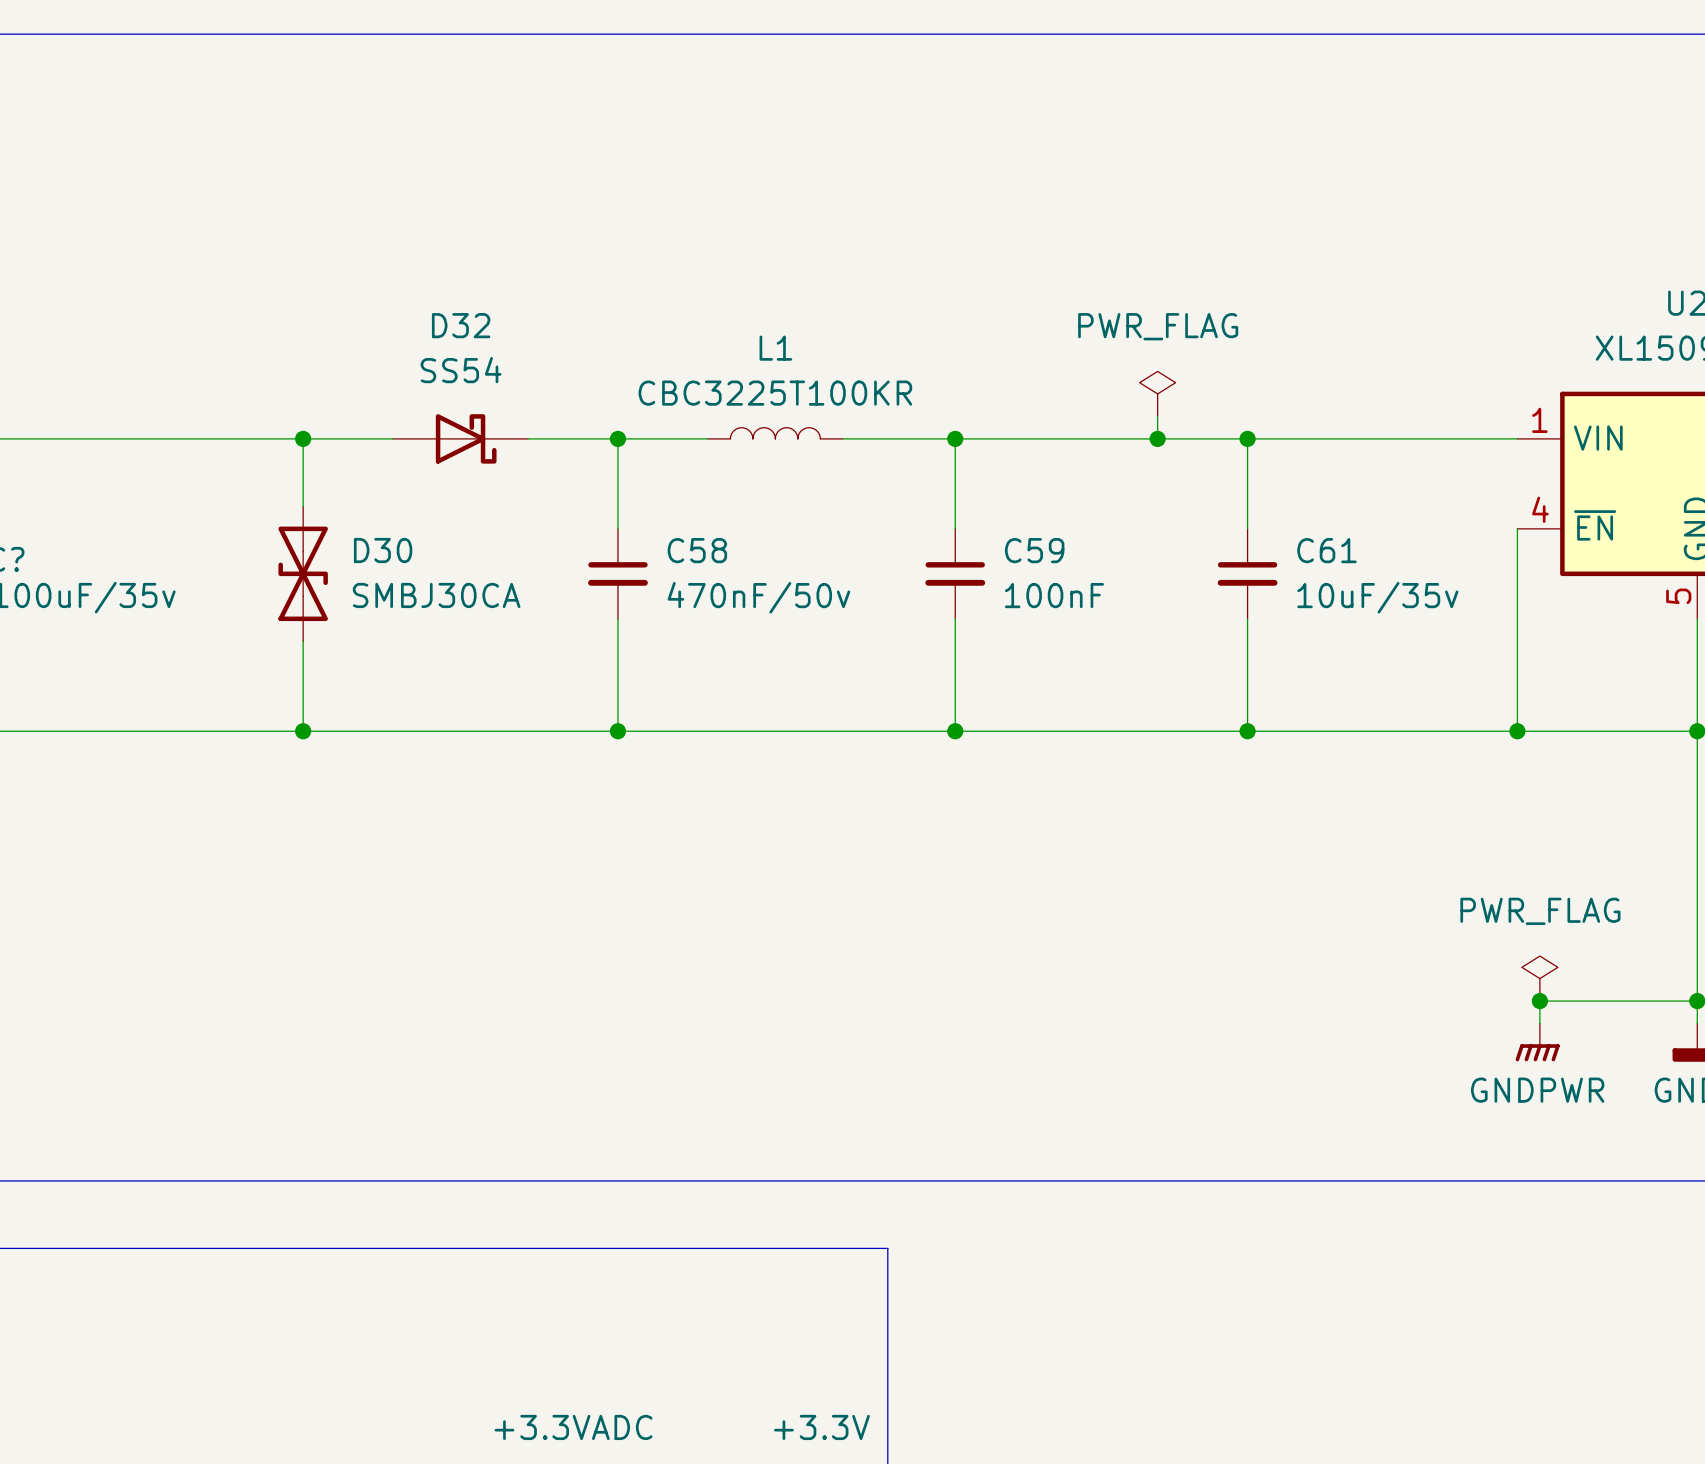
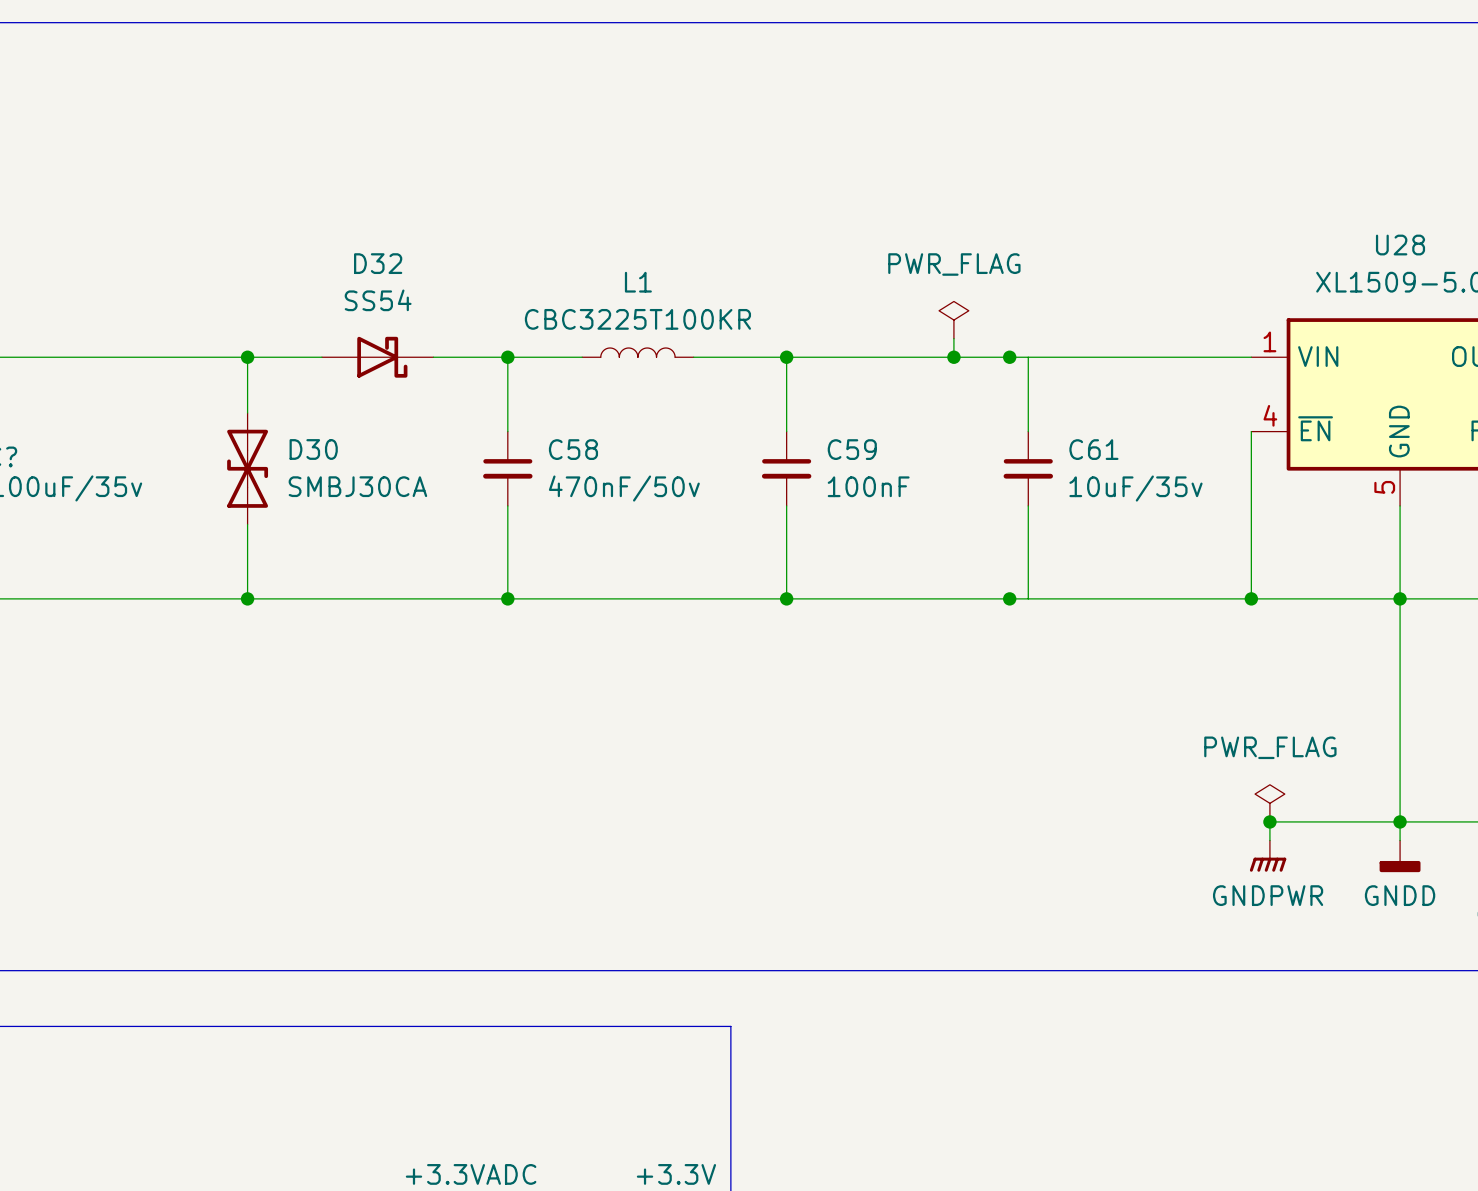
junction position: (1247, 438) -> (1009, 357)
junction position: (1247, 731) -> (1009, 598)

